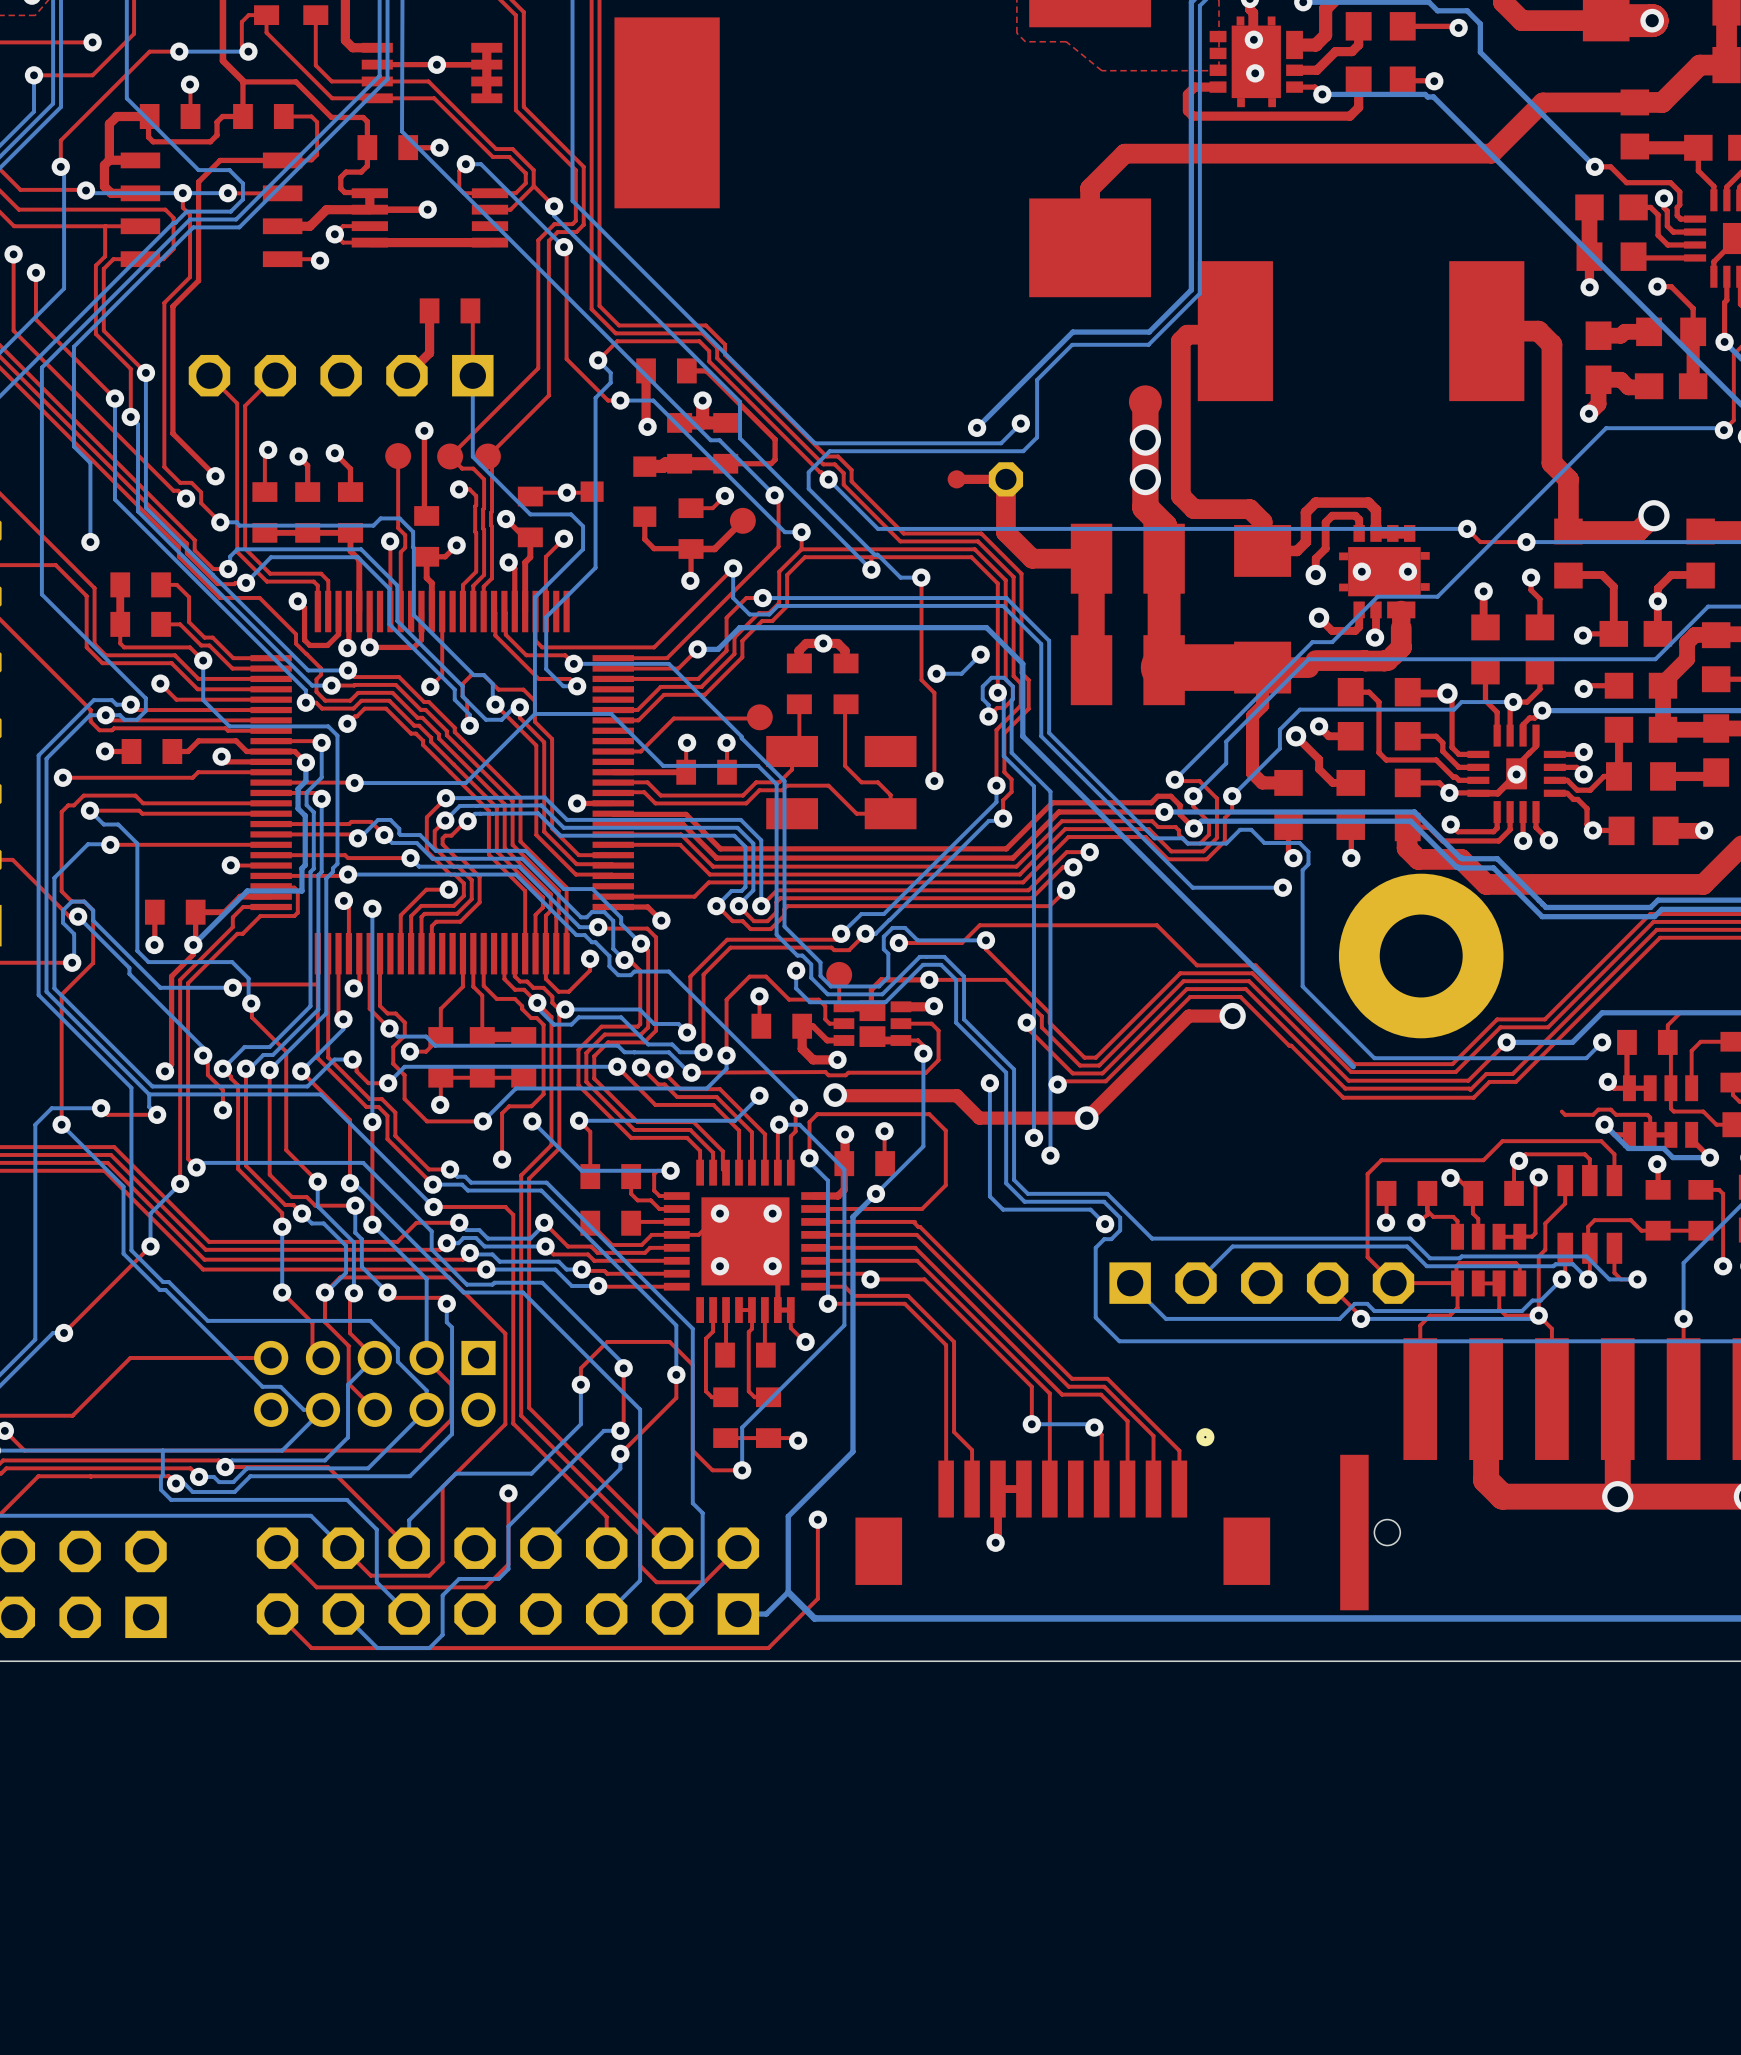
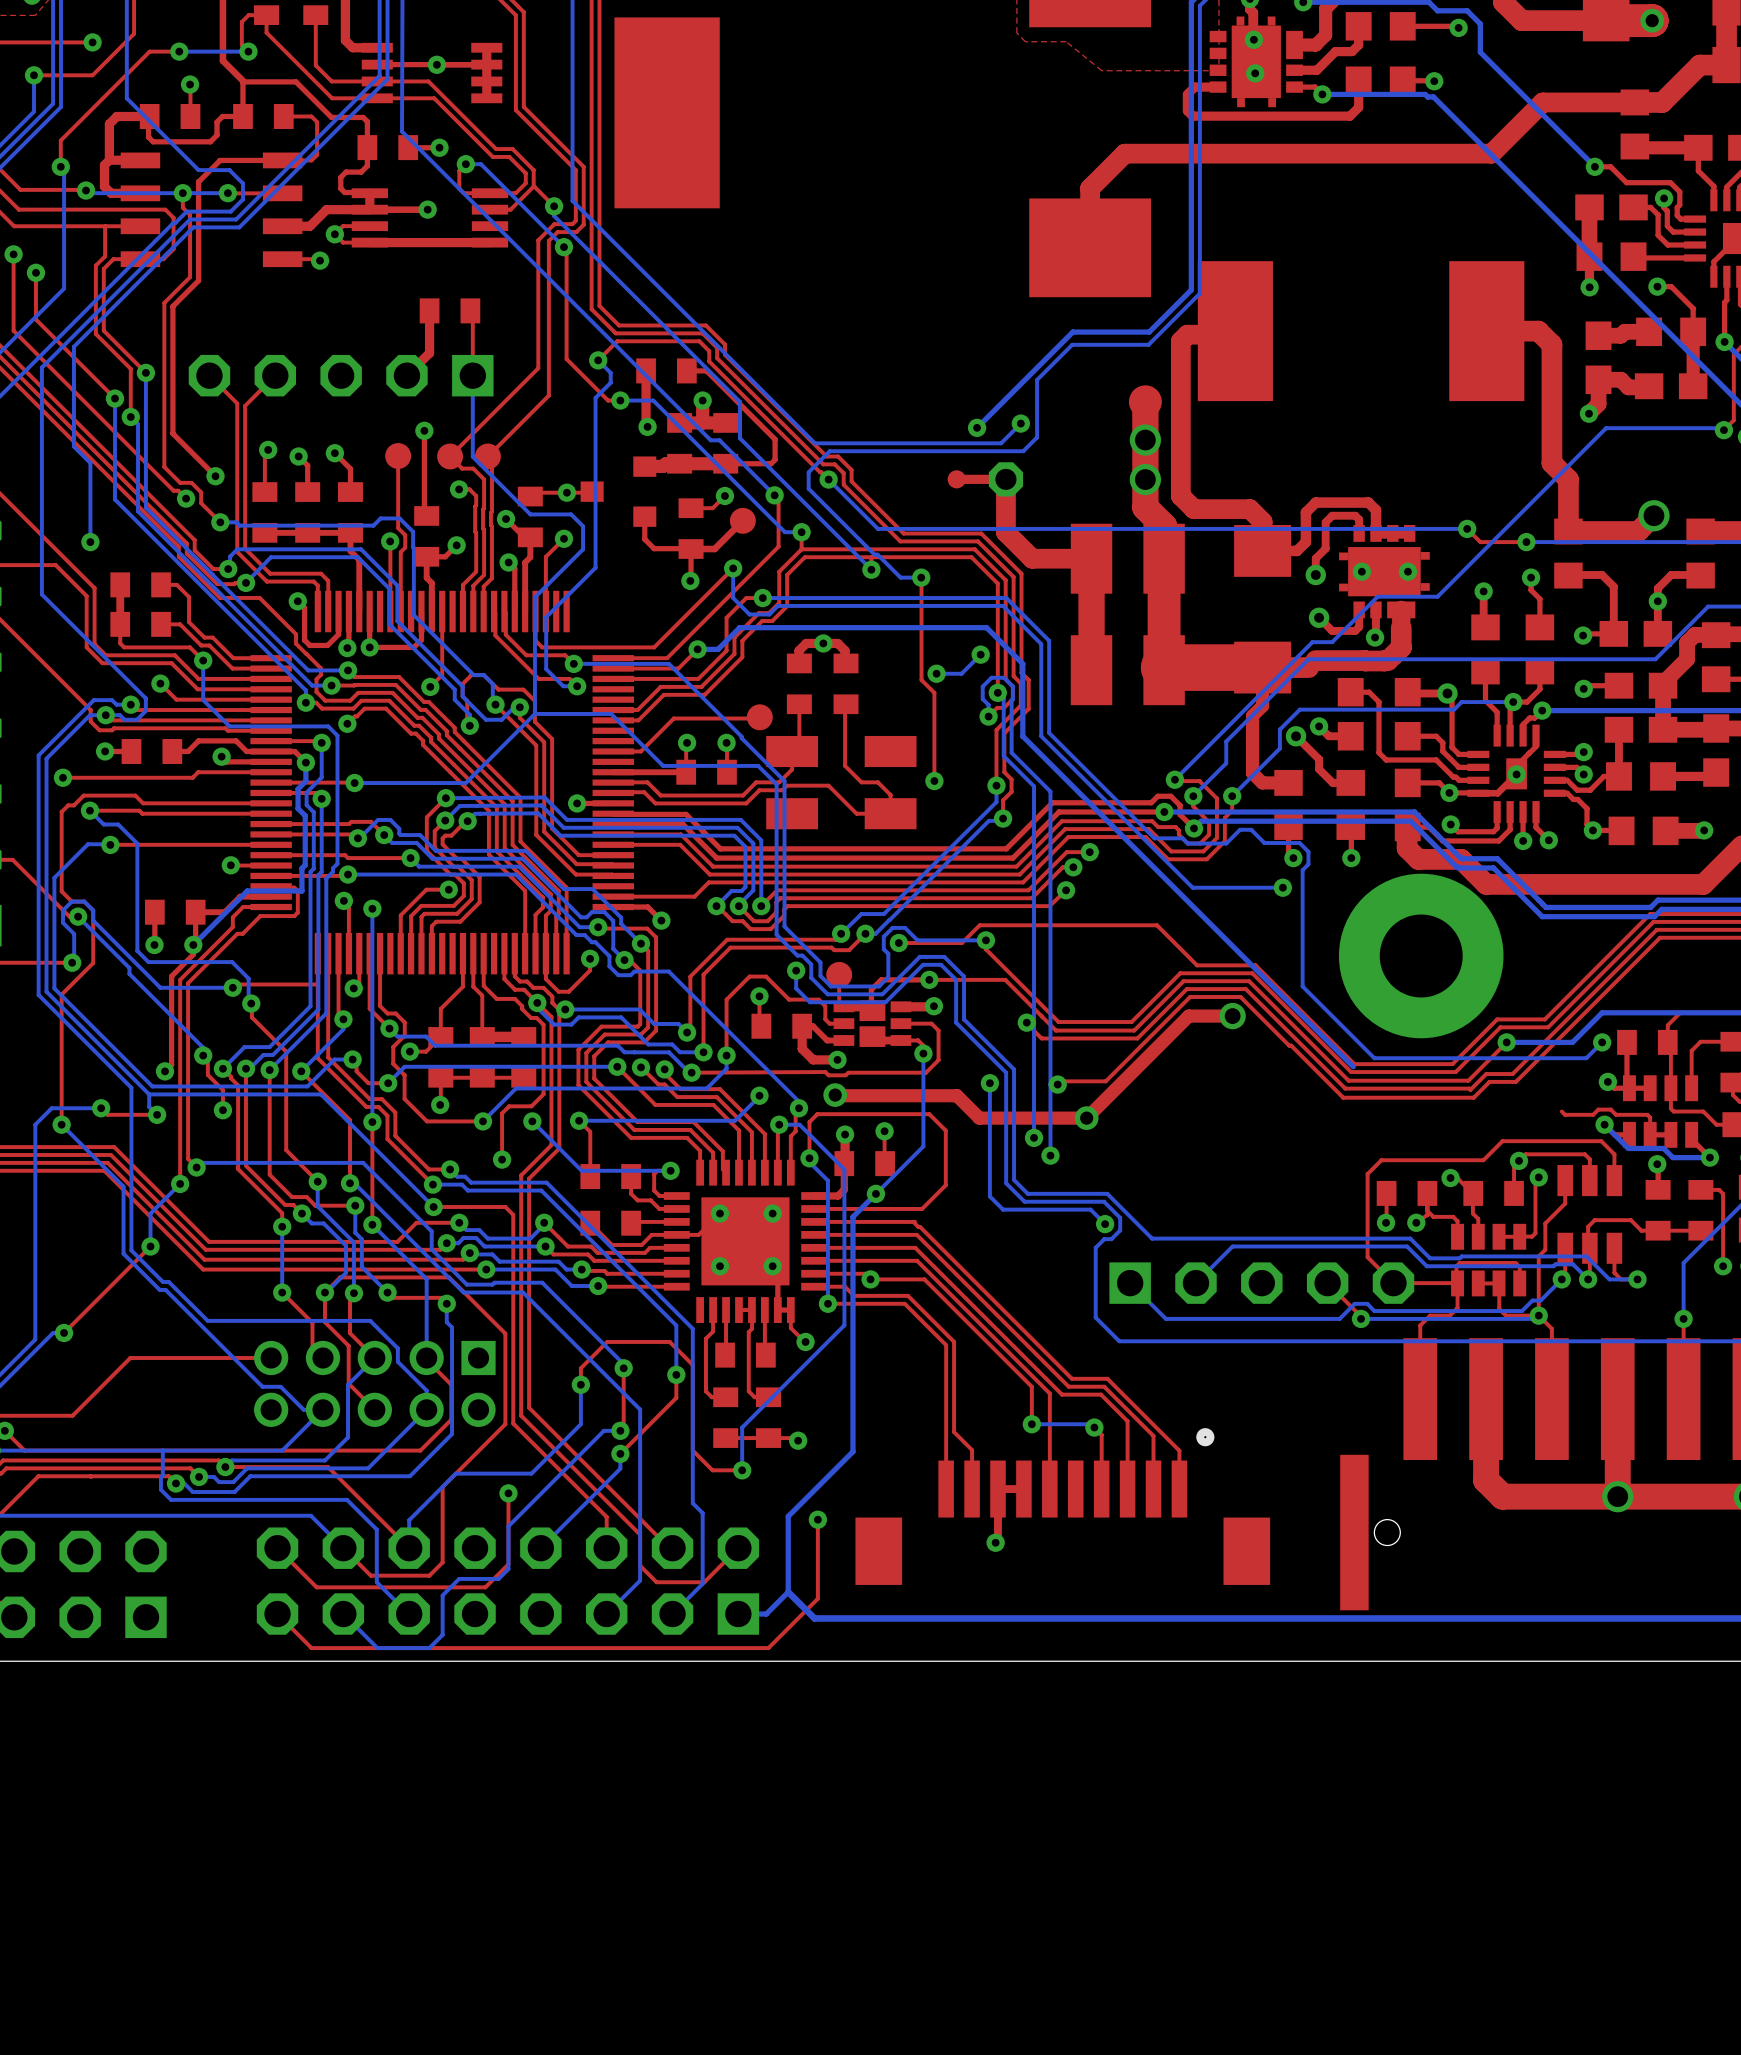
top track: (1049, 1013) (1049, 1022) (1084, 1057) (1095, 1057) (1131, 1022) -> (1049, 1013) (1058, 1022) (1131, 1022)
top track: (1041, 1016) (1041, 1027) (1079, 1065) (1099, 1065) (1134, 1030) -> (1041, 1016) (1056, 1030) (1134, 1030)
top track: (1026, 1022) (1026, 1027) (1072, 1073) (1102, 1073) (1137, 1038) -> (1026, 1022) (1041, 1038) (1137, 1038)

